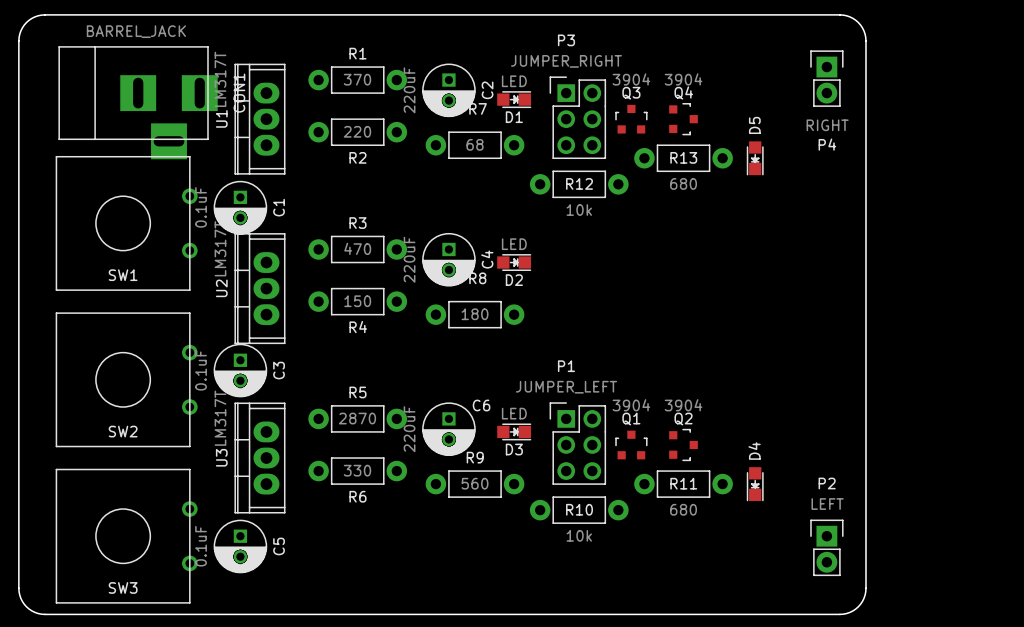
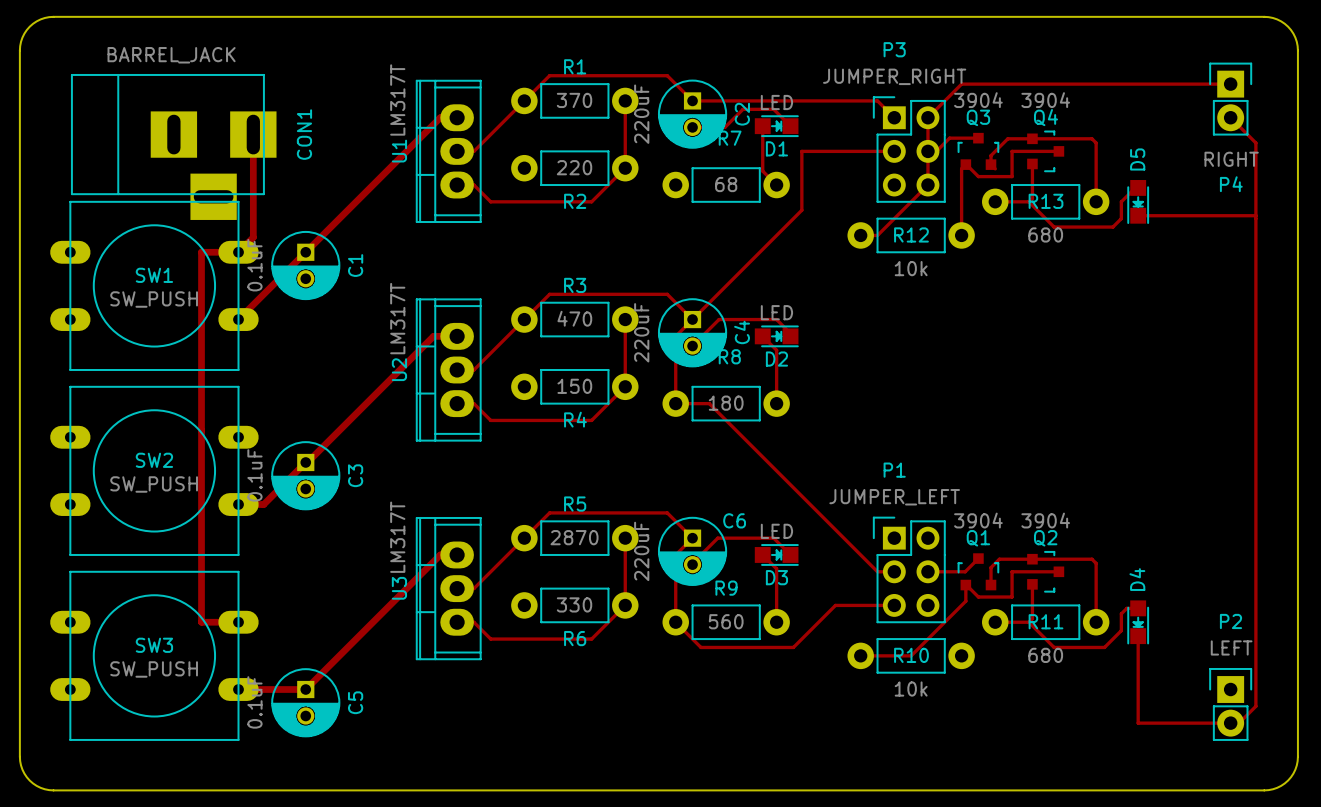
board edge: (839, 14) (849, 16) (858, 22) (864, 30) (865, 40) (865, 588) (864, 598) (858, 606) (849, 612) (839, 614) -> (1079, 16) (1268, 17) (1281, 21) (1288, 26) (1296, 41) (1297, 756) (1296, 765) (1290, 777) (1281, 785) (1268, 790) (1079, 790)
track: none -> (1230, 84) (961, 84) (927, 117) (927, 185) (877, 235) (860, 235)
P4 position: (826, 78) -> (1230, 99)
R1 position: (357, 80) -> (574, 100)
track: none -> (625, 100) (625, 168) (591, 201) (490, 201) (473, 185) (457, 185)
C2 position: (448, 90) -> (692, 114)
track: none -> (457, 117) (440, 117) (238, 319)
track: none -> (894, 117) (877, 100) (692, 100) (667, 75) (549, 75) (473, 151) (457, 151)
track: none -> (1230, 117) (1255, 142) (1255, 706) (1239, 723) (1138, 723) (1138, 636)
D1 position: (514, 99) -> (776, 126)
track: none -> (762, 126) (762, 171) (776, 185)
track: none -> (790, 126) (773, 109) (743, 109) (724, 127) (692, 127)
CON1 position: (138, 102) -> (173, 146)
track: none -> (253, 134) (253, 237) (238, 252) (201, 252) (201, 622) (238, 622)
track: none -> (978, 138) (949, 138) (936, 151) (927, 151)
P3 position: (577, 117) -> (909, 149)
U1 position: (259, 119) -> (448, 151)
Q3 position: (631, 119) -> (978, 151)
Q4 position: (683, 119) -> (1045, 151)
track: none -> (894, 151) (801, 151) (801, 210) (675, 336) (675, 403) (709, 403) (877, 571) (894, 571)
track: none -> (1058, 151) (1012, 151) (1012, 176) (978, 176) (965, 164)
track: none -> (1032, 163) (1032, 198) (1028, 201)
track: none -> (965, 164) (961, 168) (961, 235)
R2 position: (357, 132) -> (574, 168)
track: none -> (995, 168) (991, 164) (991, 155) (1007, 138) (1091, 138) (1096, 142) (1096, 201)
R7 position: (475, 145) -> (726, 185)
track: none -> (1138, 187) (1135, 187) (1121, 201) (1121, 218) (1112, 227) (1054, 227) (1028, 201)
SW1 footprint: [55, 155, 198, 291] -> [50, 200, 259, 371]
R13 position: (683, 158) -> (1045, 201)
D5 position: (755, 158) -> (1138, 202)
track: none -> (995, 201) (1028, 201)
track: none -> (1138, 215) (1255, 215)
R12 position: (579, 184) -> (911, 235)
SW1 value: none -> SW_PUSH (154, 299)
R3 position: (357, 249) -> (574, 319)
track: none -> (625, 319) (625, 386) (591, 420) (490, 420) (473, 403) (457, 403)
track: none -> (692, 319) (667, 294) (549, 294) (473, 369) (457, 369)
C4 position: (448, 259) -> (692, 332)
track: none -> (457, 336) (433, 336) (263, 504) (238, 504) (255, 504)
D2 position: (514, 262) -> (776, 336)
track: none -> (762, 336) (776, 350) (776, 403)
track: none -> (790, 336) (790, 333) (776, 319) (719, 319) (692, 346)
SW1 name position: SW1 (123, 275) -> SW1 (154, 275)
U2 position: (259, 288) -> (448, 369)
R4 position: (357, 301) -> (574, 386)
SW2 footprint: [55, 312, 198, 448] -> [50, 385, 259, 556]
R8 position: (475, 314) -> (726, 403)
SW2 value: none -> SW_PUSH (154, 484)
R5 position: (357, 418) -> (574, 538)
track: none -> (625, 538) (625, 605) (591, 639) (490, 639) (473, 622) (457, 622)
C6 position: (448, 429) -> (692, 551)
SW2 name position: SW2 (123, 431) -> SW2 (154, 460)
track: none -> (457, 554) (440, 554) (305, 689) (238, 689)
D3 position: (514, 431) -> (776, 554)
track: none -> (762, 554) (776, 568) (776, 622)
track: none -> (790, 554) (773, 538) (717, 538) (692, 564)
track: none -> (978, 558) (965, 571) (927, 571)
P1 position: (577, 443) -> (909, 569)
Q2 position: (683, 444) -> (1045, 571)
track: none -> (1058, 571) (1012, 571) (1012, 597) (978, 597) (965, 585) (965, 601) (911, 655) (860, 655)
Q1 position: (631, 445) -> (978, 571)
track: none -> (1032, 584) (1032, 618) (1028, 622)
track: none -> (991, 585) (991, 567) (999, 559) (1091, 559) (1096, 563) (1096, 622)
U3 position: (259, 458) -> (448, 588)
track: none -> (457, 588) (473, 588) (549, 512) (667, 512) (692, 538) (675, 554) (675, 622) (700, 647) (793, 647) (835, 605) (894, 605)
SW3 footprint: [55, 468, 198, 604] -> [50, 570, 259, 741]
R6 position: (357, 471) -> (574, 605)
track: none -> (1138, 608) (1126, 608) (1121, 613) (1121, 630) (1104, 647) (1054, 647) (1028, 622)
R9 position: (475, 484) -> (726, 622)
R11 position: (683, 484) -> (1045, 622)
D4 position: (755, 484) -> (1138, 622)
track: none -> (995, 622) (1028, 622)
R10 position: (579, 510) -> (911, 655)
SW3 value: none -> SW_PUSH (154, 669)
P2 position: (826, 547) -> (1230, 704)
SW3 name position: SW3 (123, 587) -> SW3 (154, 645)

